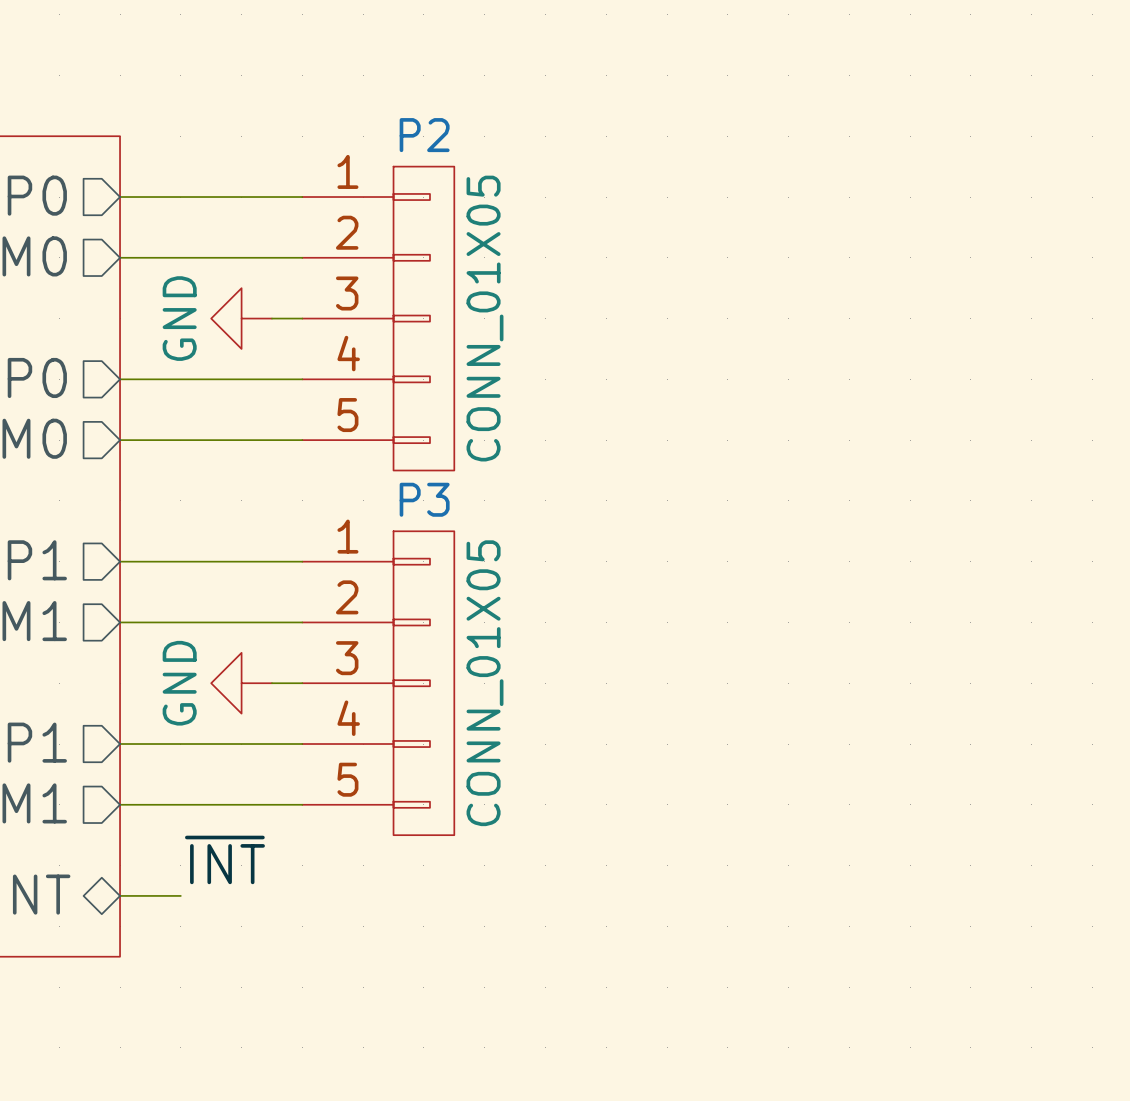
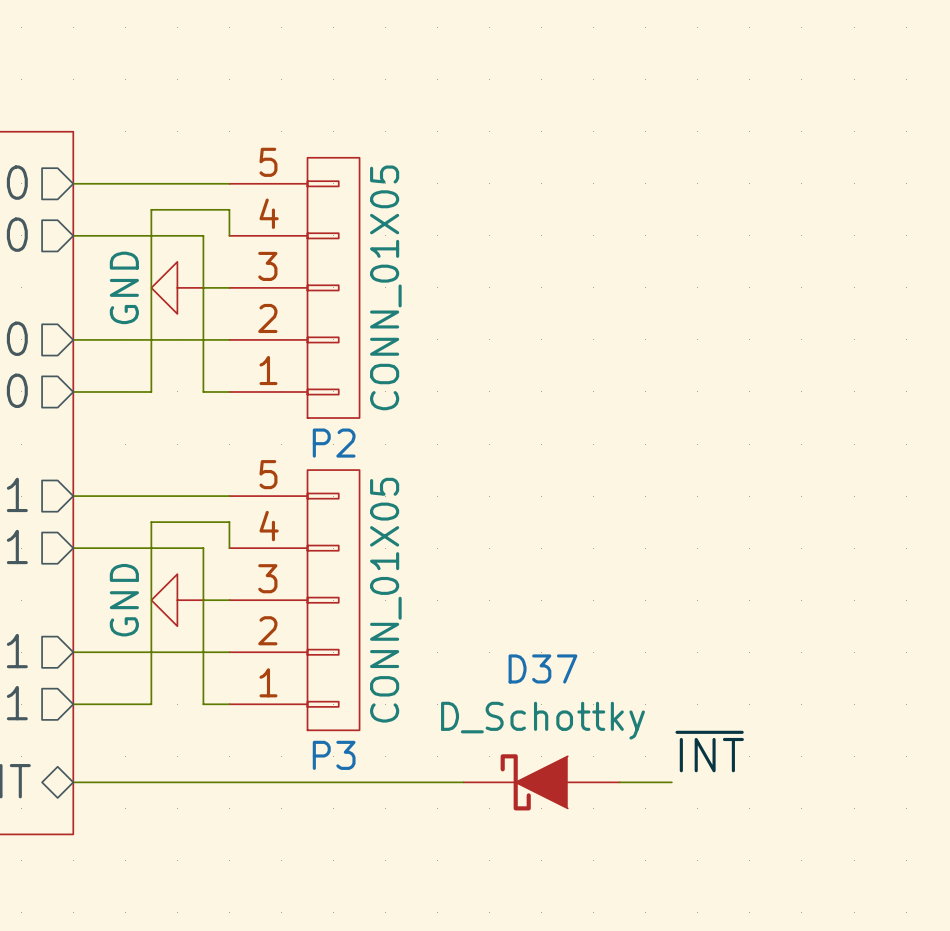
wire: (271, 257) (302, 257) -> (203, 235) (203, 391)
P2 flip: as is (423, 318) -> up-down (333, 287)
wire: (211, 440) (271, 440) -> (151, 391) (151, 209) (229, 209) (229, 235)
wire: (271, 622) (302, 622) -> (203, 548) (203, 704)
P3 flip: as is (423, 683) -> up-down (333, 600)
wire: (211, 804) (271, 804) -> (151, 704) (151, 522) (229, 522) (229, 548)
label: ~{INT} (224, 859) -> none
label: none -> ~{INT} (709, 751)
wire: none -> (125, 782) (463, 782)
D37: none -> D_Schottky (541, 782)
wire: none -> (619, 782) (671, 782)

